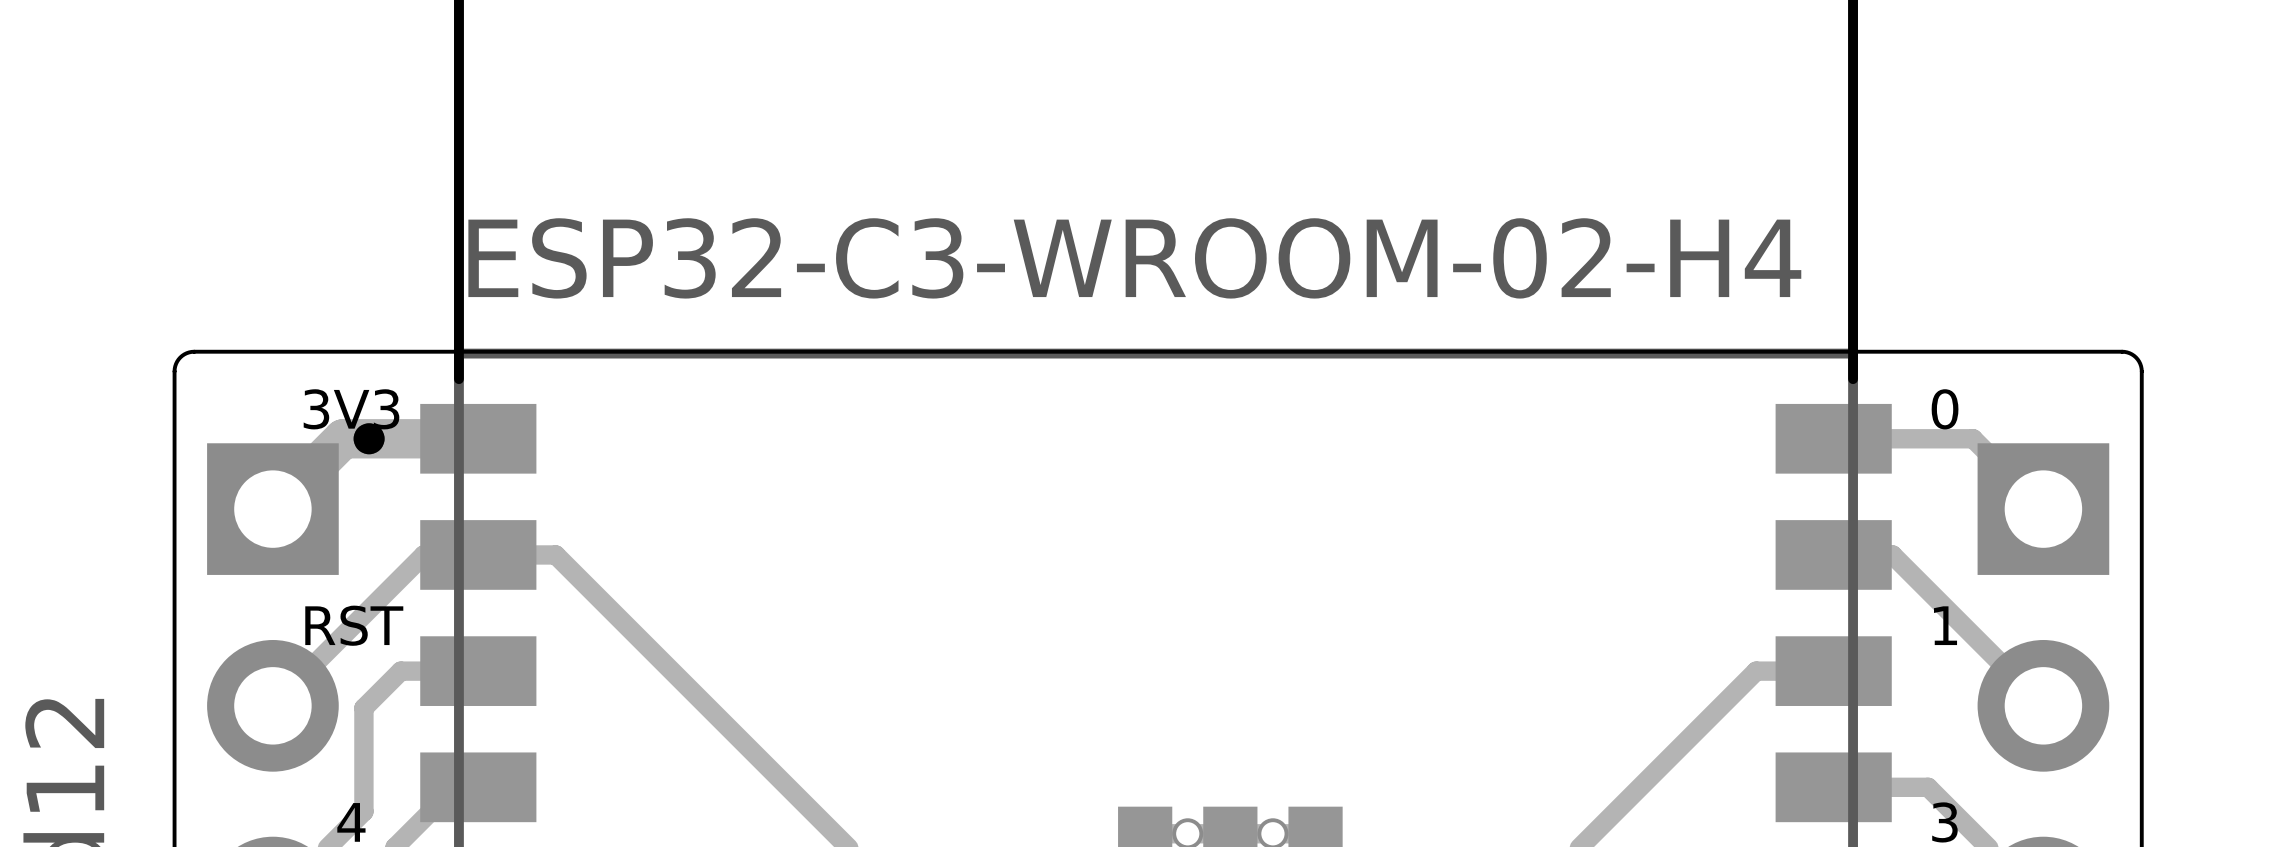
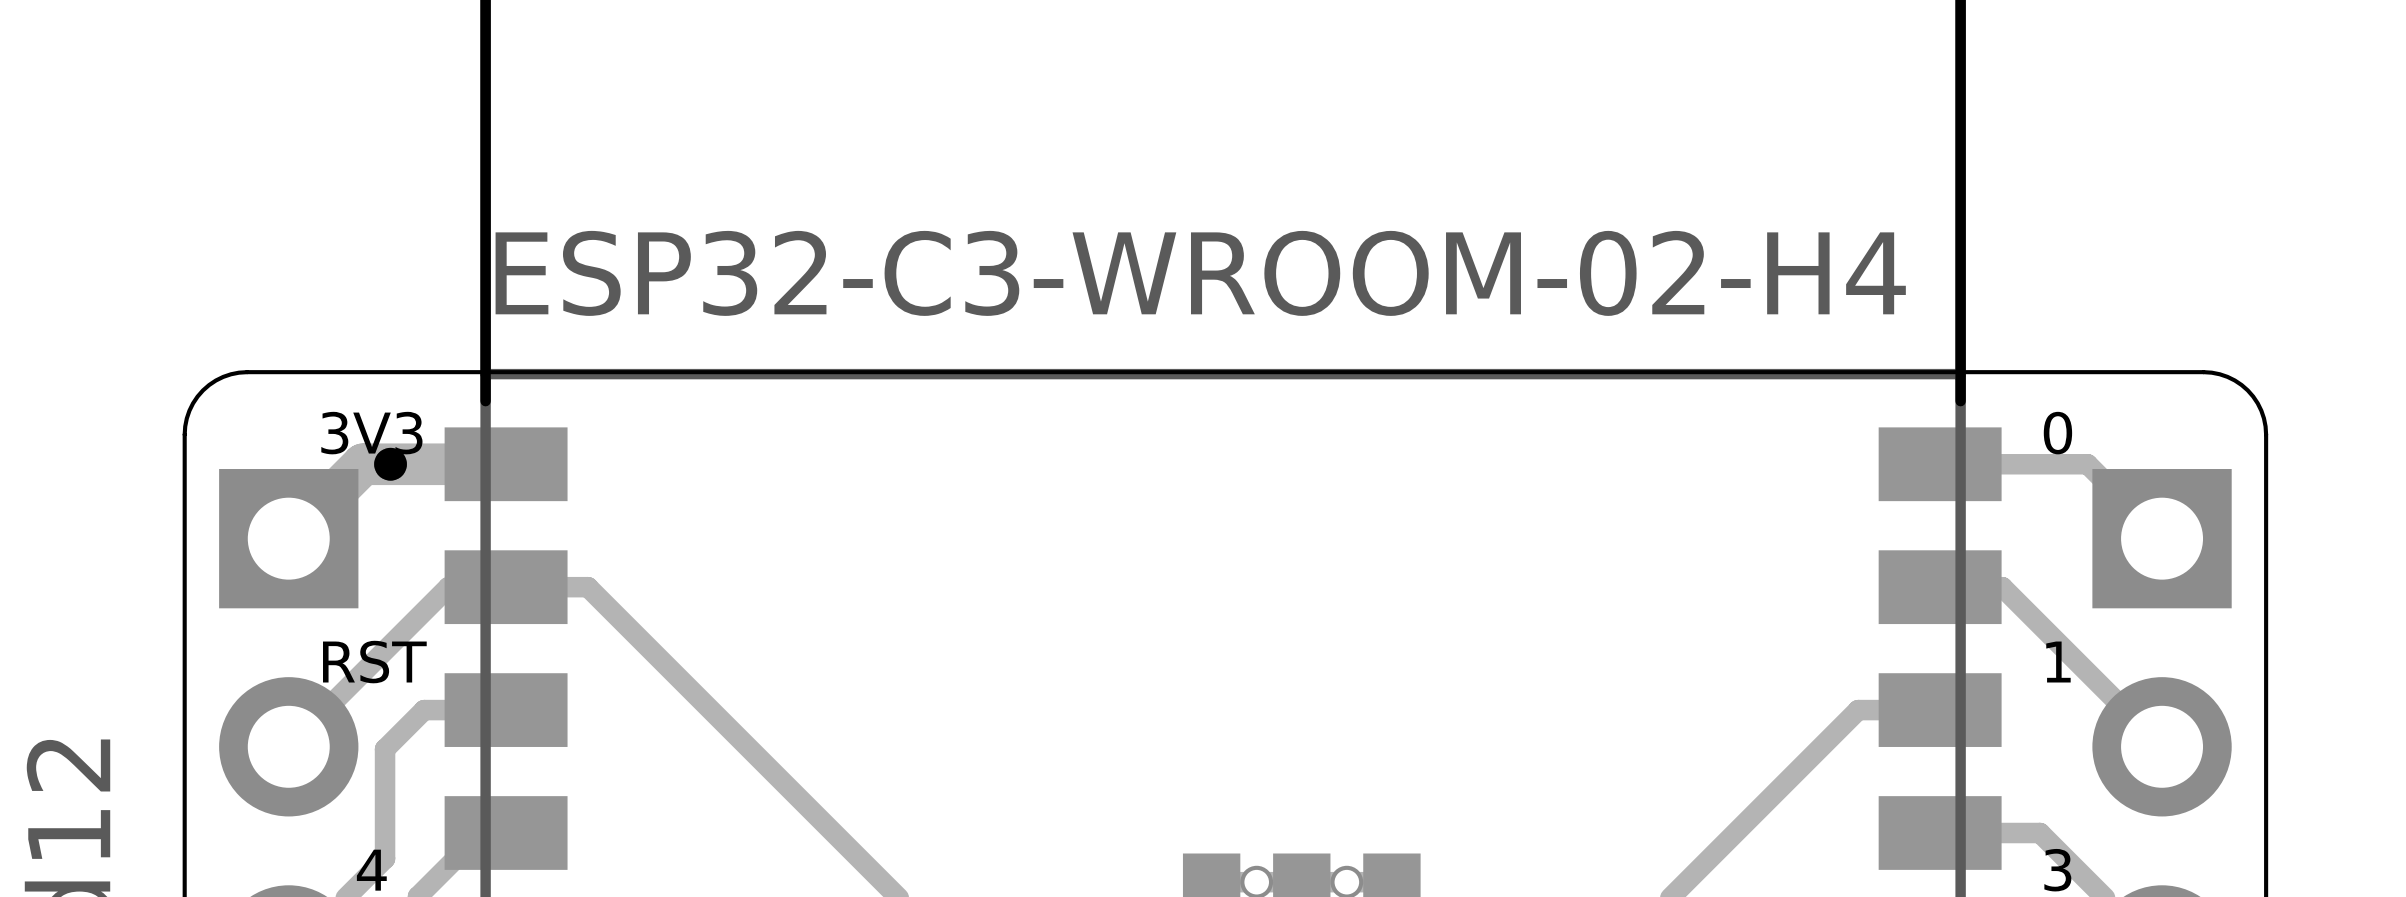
board edge: (233, 351) (191, 351) (180, 357) (174, 368) (174, 410) -> (247, 372) (223, 376) (202, 390) (189, 410) (184, 434)
board edge: (2082, 351) (2124, 351) (2136, 357) (2141, 368) (2141, 410) -> (2203, 372) (2227, 376) (2247, 390) (2261, 410) (2266, 434)

